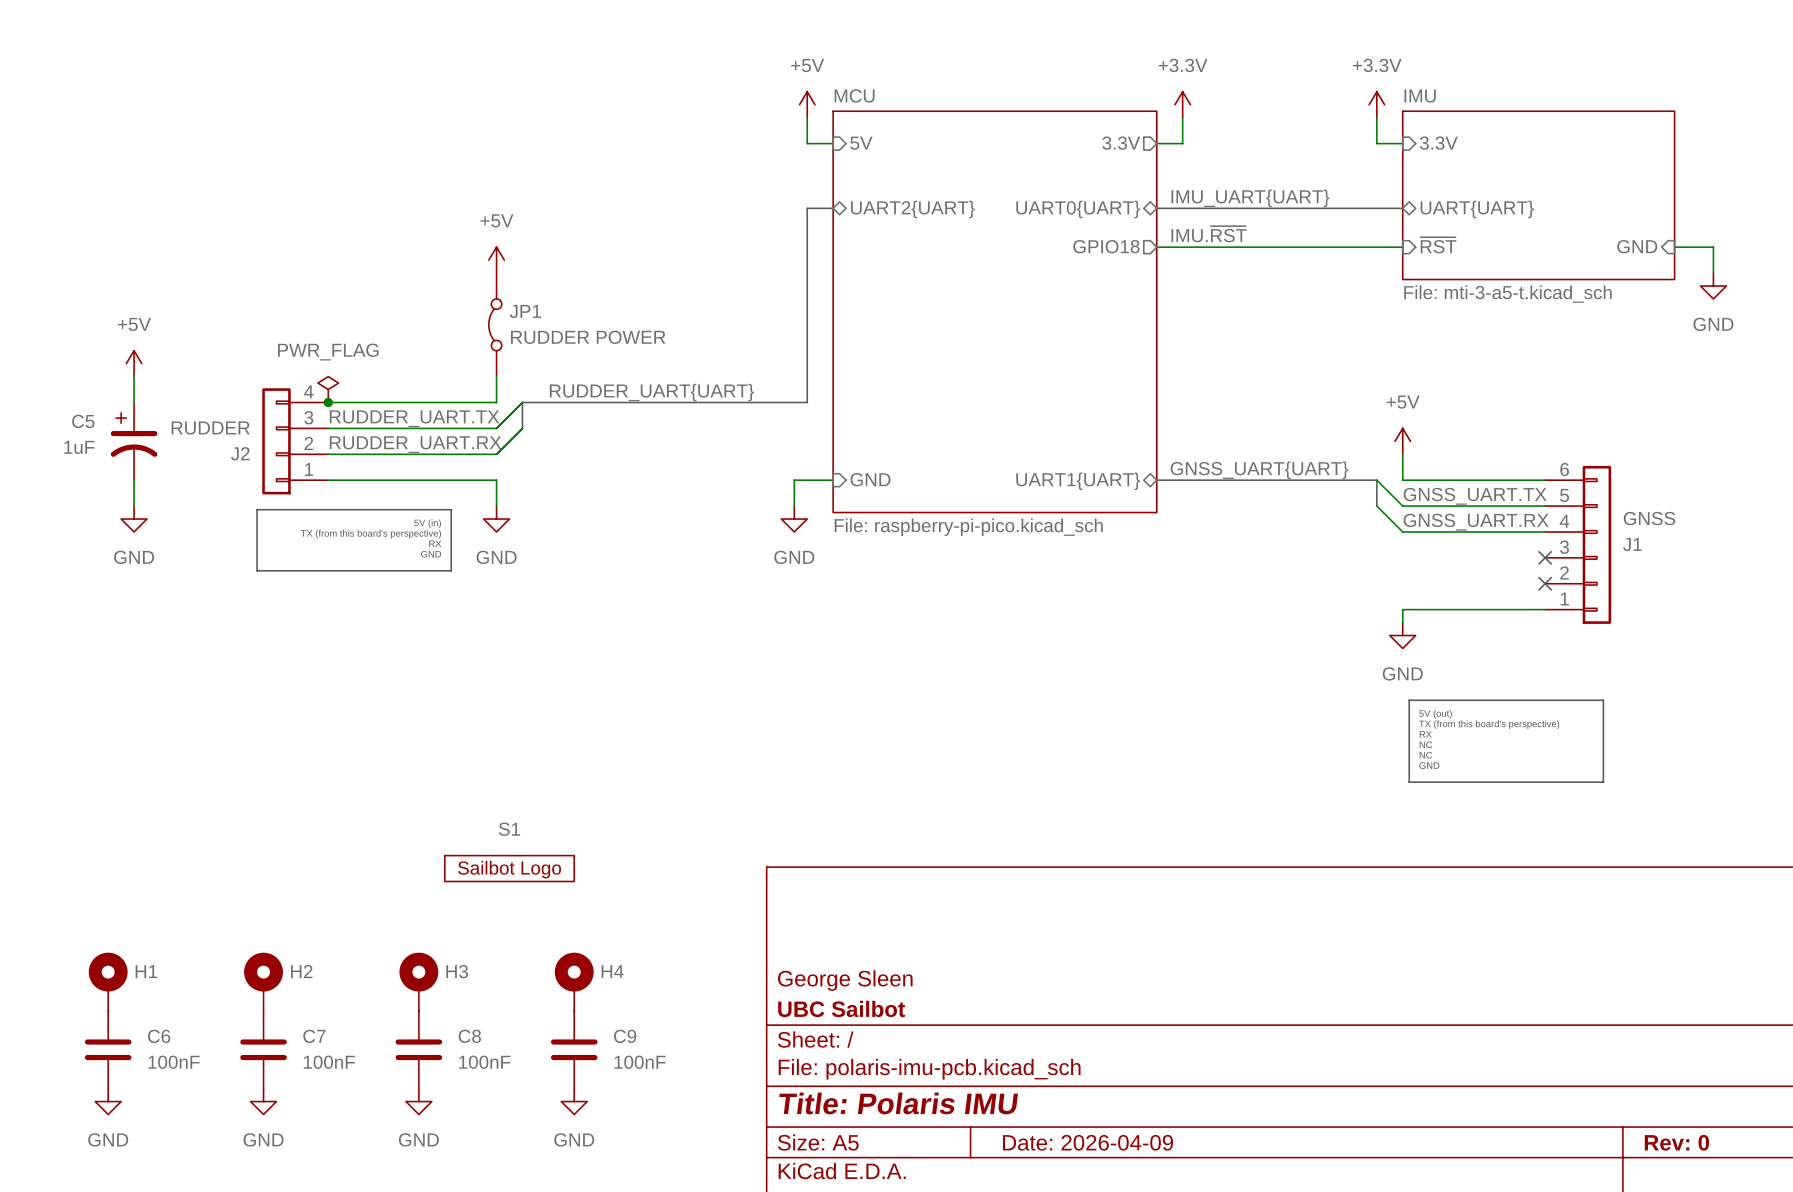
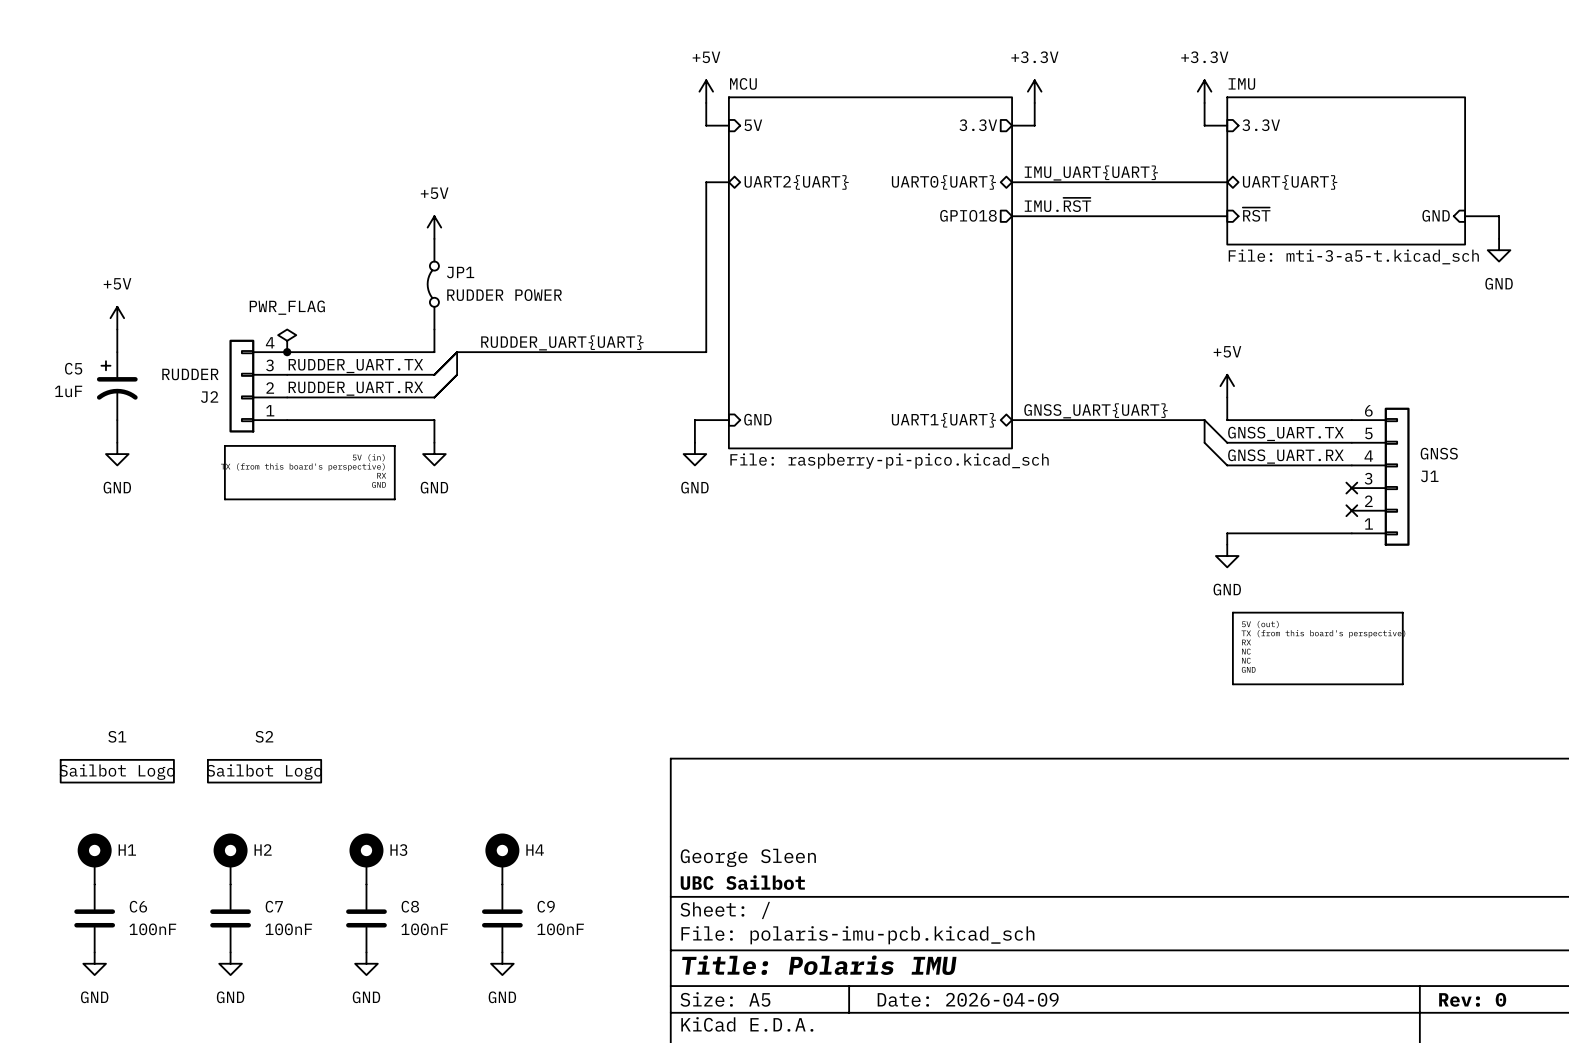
S1 position: (509, 868) -> (117, 771)
S2: none -> (264, 771)

